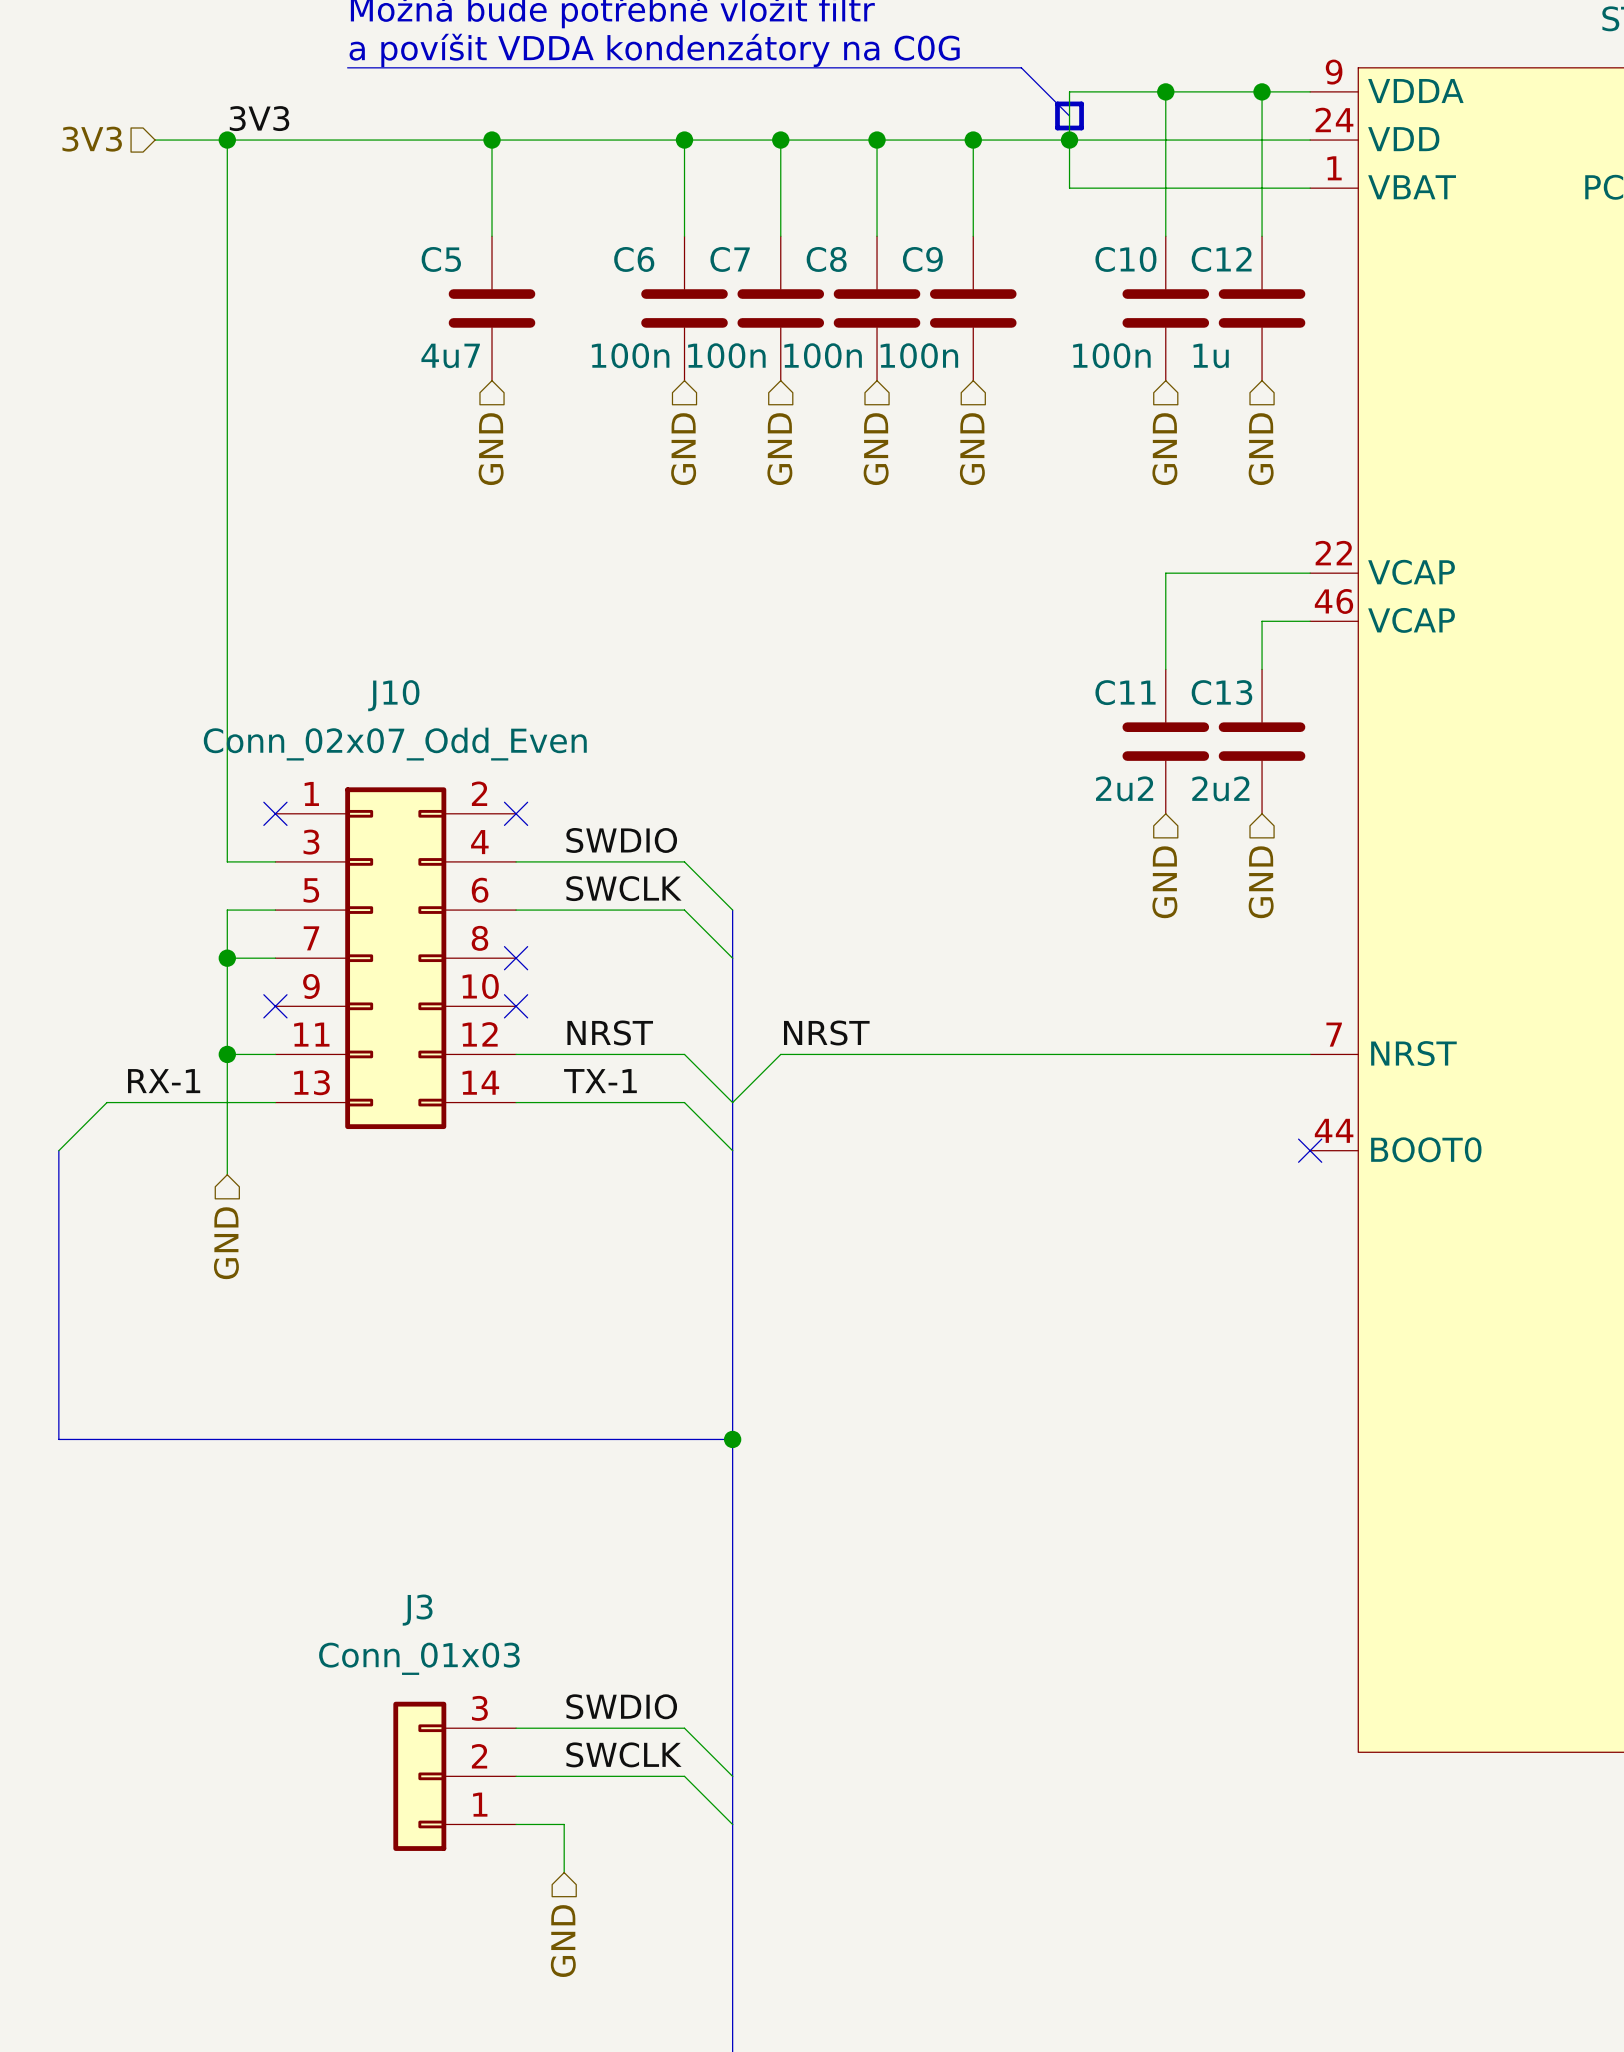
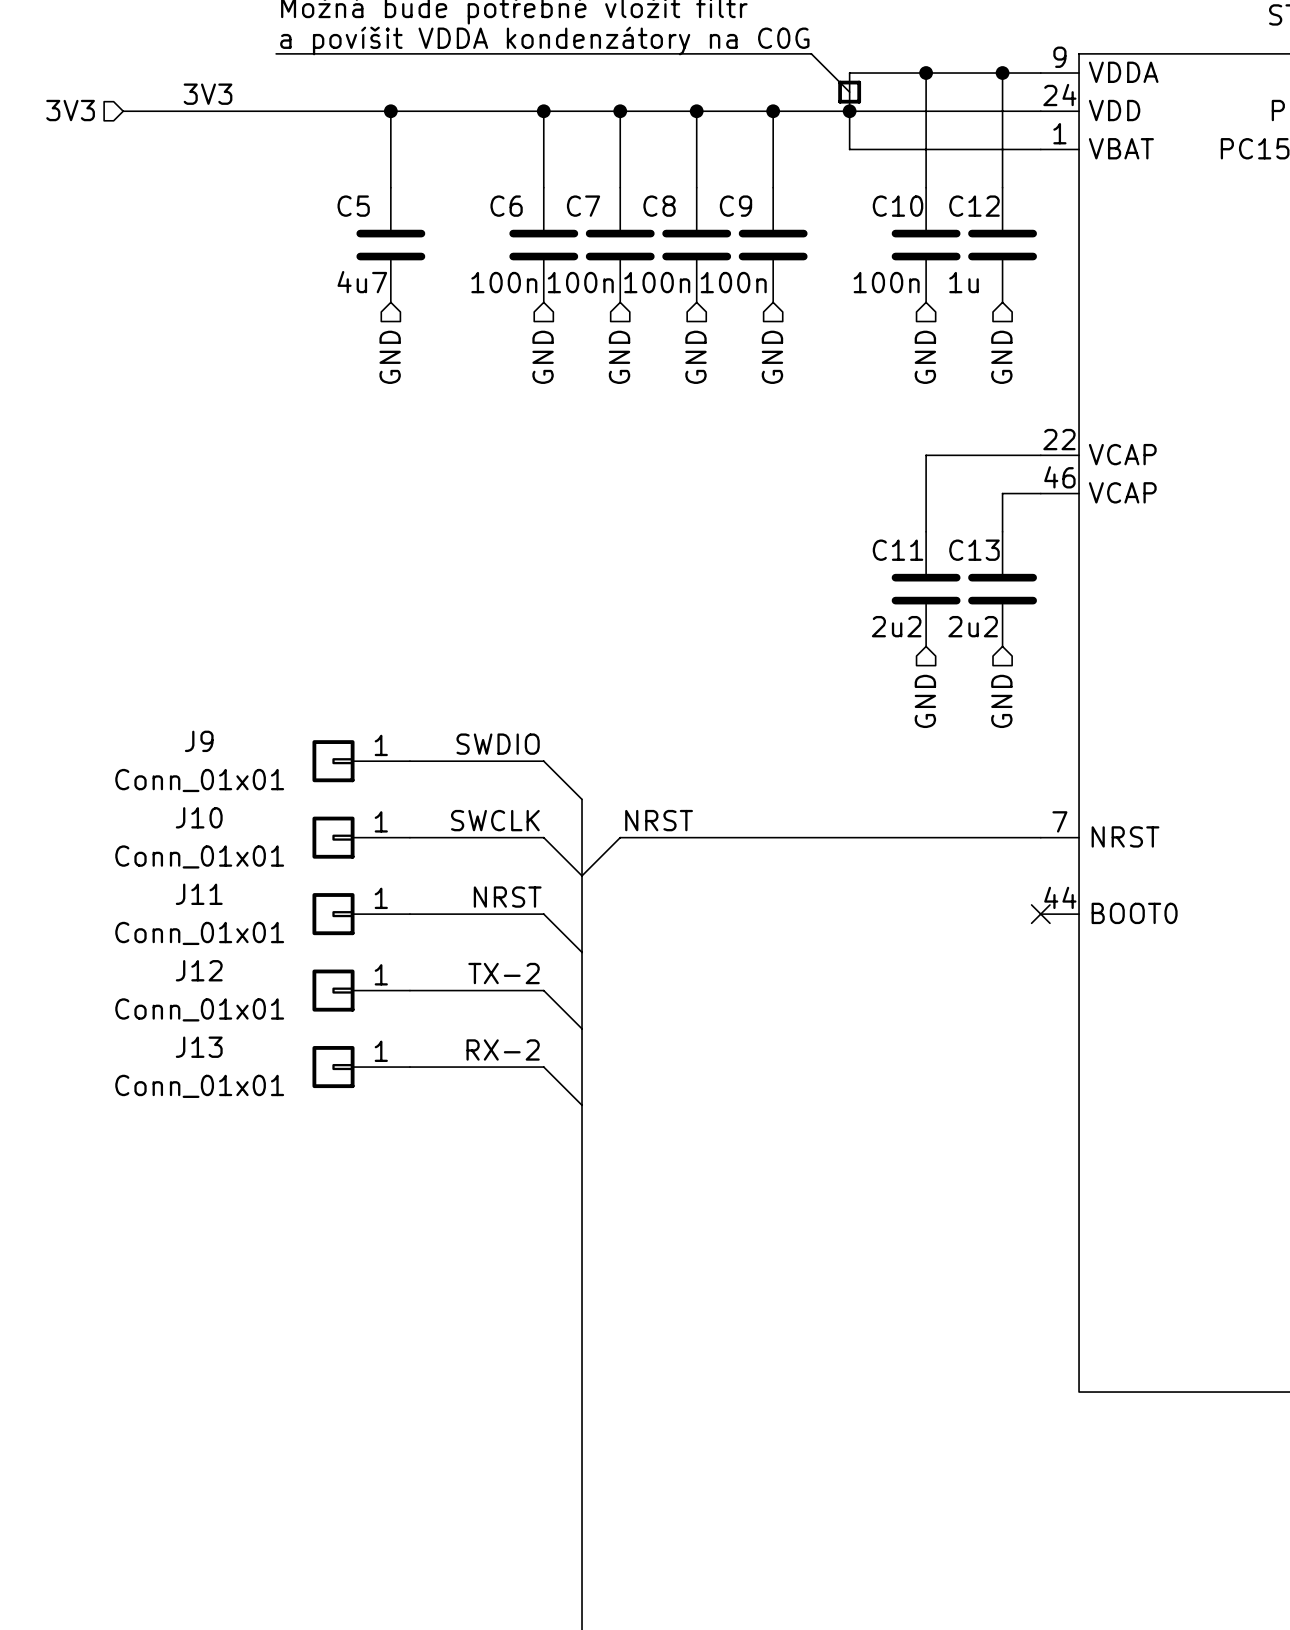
wire: (227, 140) (227, 861) (275, 861) -> none
junction: (227, 140) -> none
J10 name position: J10 (393, 695) -> J10 (199, 817)
J10 value: Conn_02x07_Odd_Even (395, 744) -> Conn_01x01 (199, 856)
J10 symbol: [275, 787, 517, 1130] -> [312, 816, 410, 859]
no-connect mark: (275, 813) -> none
no-connect mark: (516, 813) -> none
label position: SWDIO (621, 840) -> SWDIO (498, 744)
wire: (516, 861) (684, 861) (732, 910) -> (409, 990) (543, 990) (582, 1028)
label position: SWCLK (623, 888) -> SWCLK (495, 820)
wire: (275, 910) (227, 910) (227, 1174) -> none
wire: (516, 910) (684, 910) (732, 958) -> (409, 761) (543, 761) (582, 799)
bus: (732, 910) (732, 1006) -> none
wire: (227, 958) (275, 958) -> none
junction: (227, 958) -> none
J9: none -> Conn_01x01 (361, 761)
no-connect mark: (516, 958) -> none
no-connect mark: (275, 1006) -> none
no-connect mark: (516, 1006) -> none
label position: NRST (610, 1032) -> NRST (507, 897)
wire: (227, 1054) (275, 1054) -> none
junction: (227, 1054) -> none
label: RX-1 (164, 1081) -> none
label: TX-1 (600, 1081) -> none
wire: (275, 1102) (106, 1102) (58, 1150) -> none
wire: (516, 1102) (684, 1102) (732, 1150) -> (409, 914) (543, 914) (582, 952)
bus: (58, 1150) (58, 1439) (732, 1439) -> none
J11: none -> Conn_01x01 (361, 914)
label: none -> TX-2 (504, 973)
hierarchical label: GND (226, 1243) -> none
J12: none -> Conn_01x01 (361, 990)
label: none -> RX-2 (503, 1049)
J13: none -> Conn_01x01 (361, 1067)
junction: (732, 1439) -> none
label: SWDIO (621, 1706) -> none
wire: (516, 1728) (684, 1728) (732, 1776) -> (409, 1067) (543, 1067) (582, 1105)
label: SWCLK (623, 1754) -> none
J3: Conn_01x03 (454, 1776) -> none
wire: (516, 1776) (684, 1776) (732, 1824) -> none
wire: (516, 1824) (564, 1824) (564, 1872) -> none
hierarchical label: GND (563, 1941) -> none

